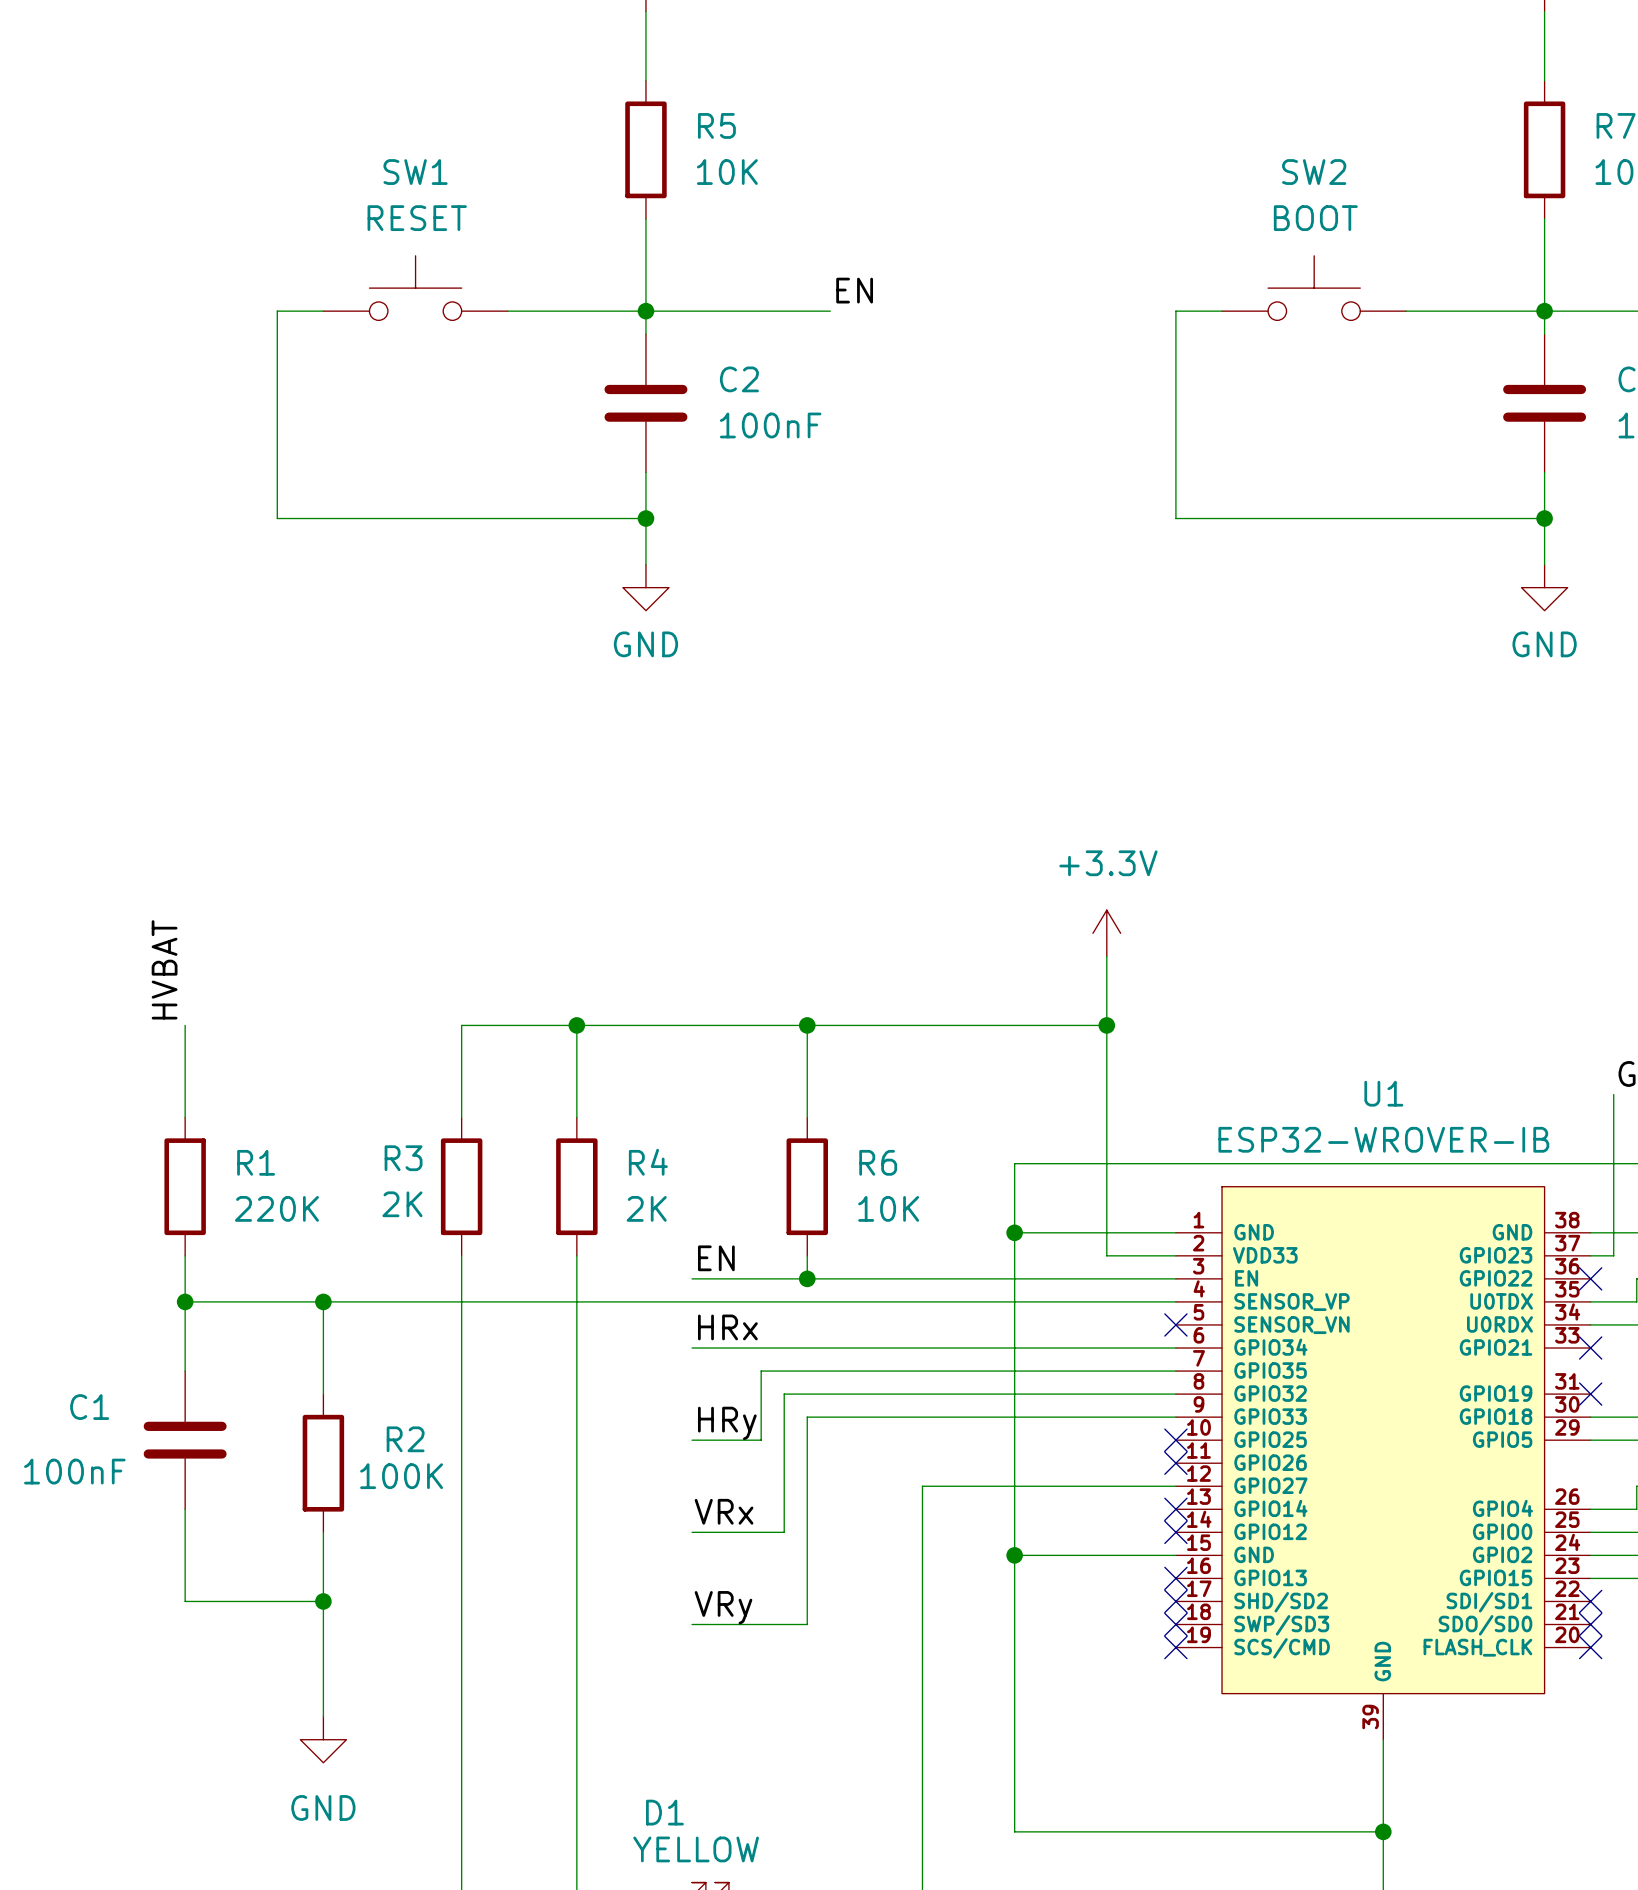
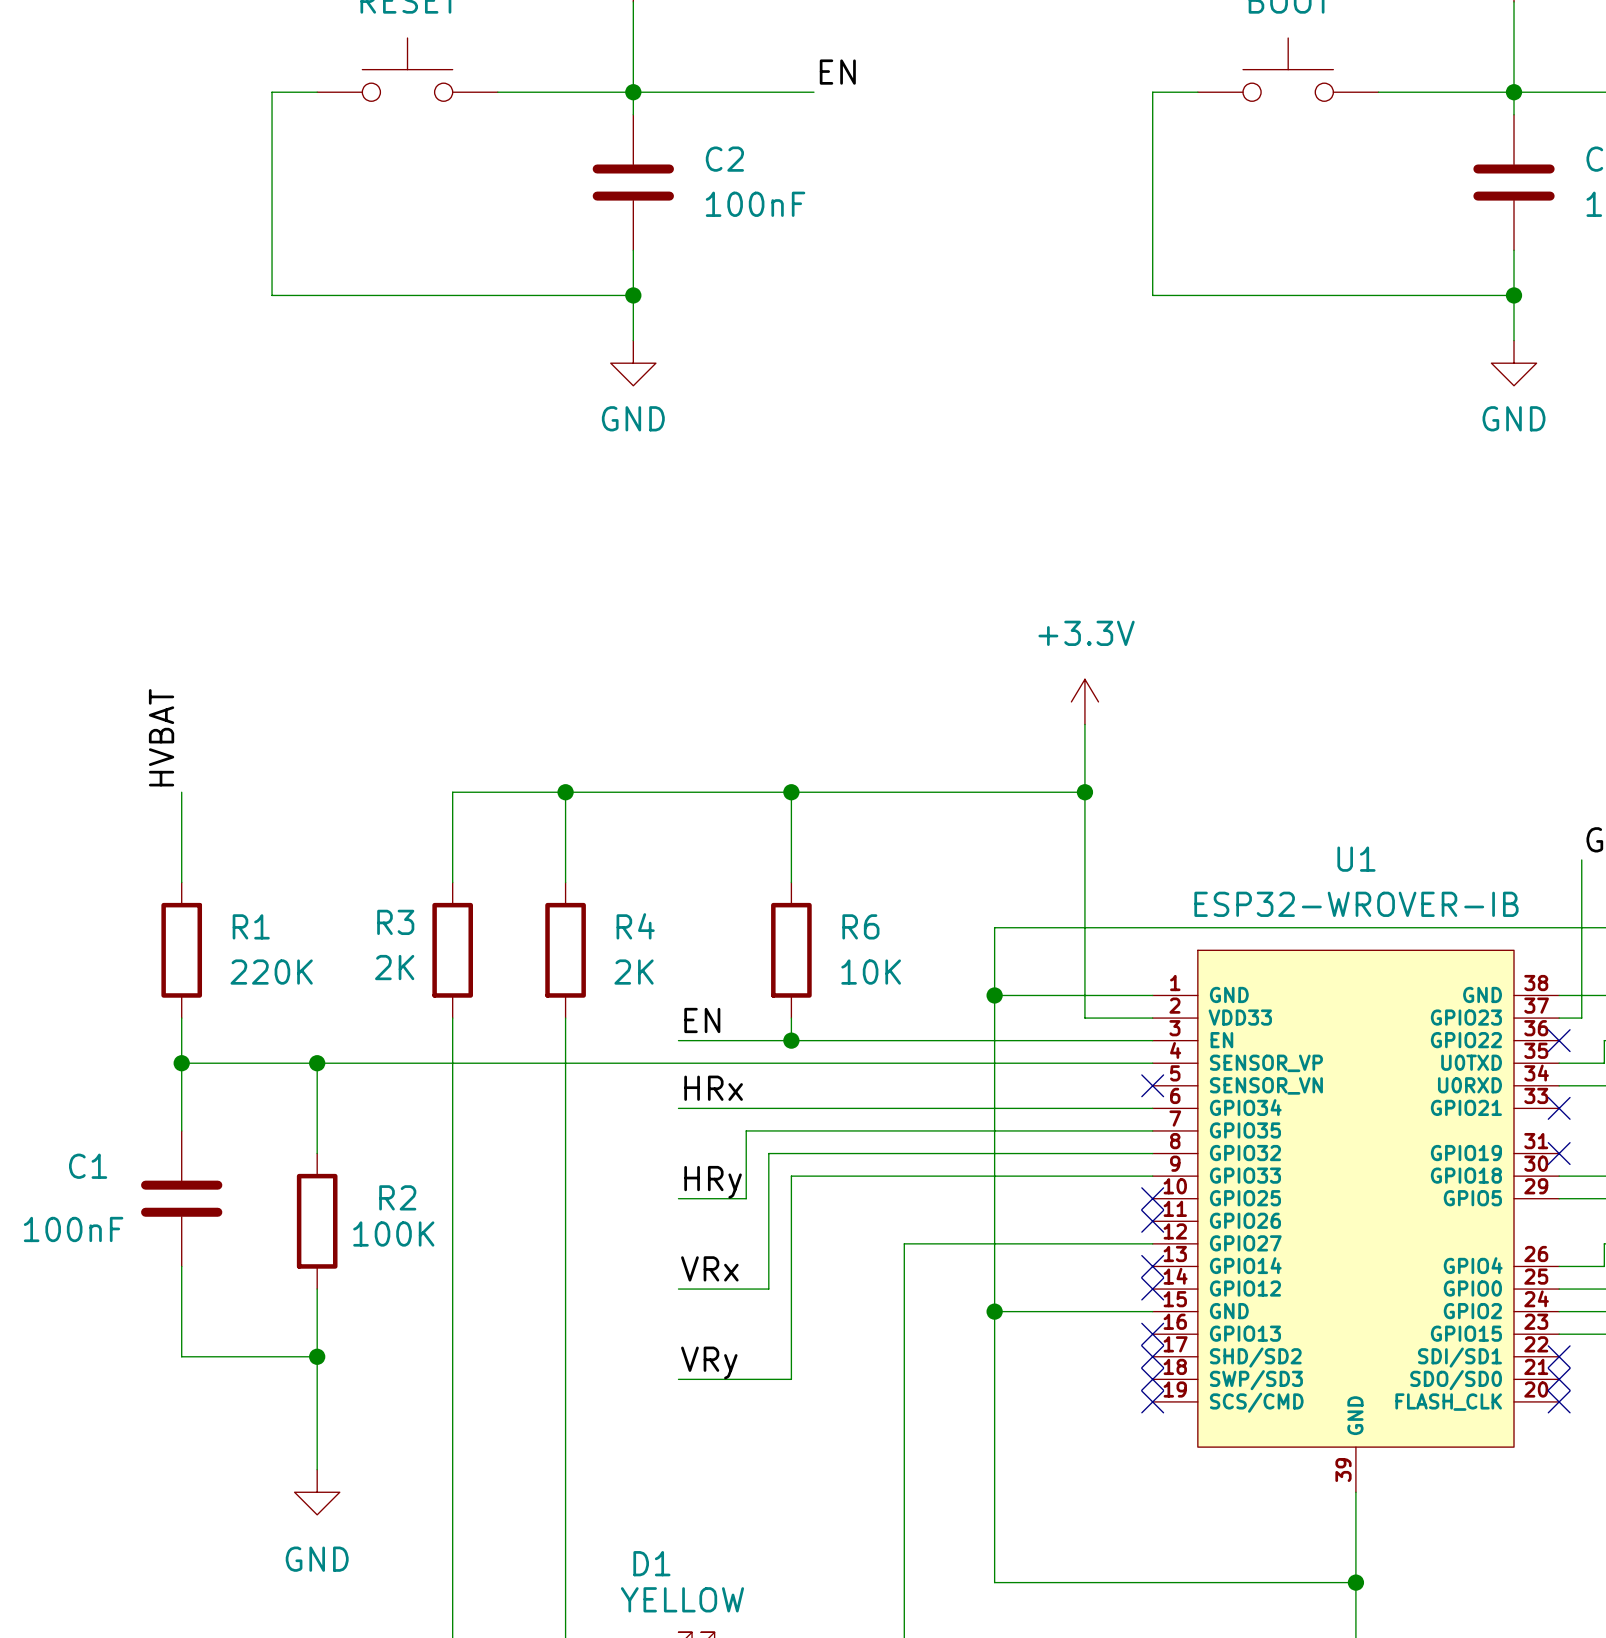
U1 pin name: U0TDX (1501, 1301) -> U0TXD (1471, 1062)
U1 pin name: U0RDX (1499, 1324) -> U0RXD (1469, 1085)

